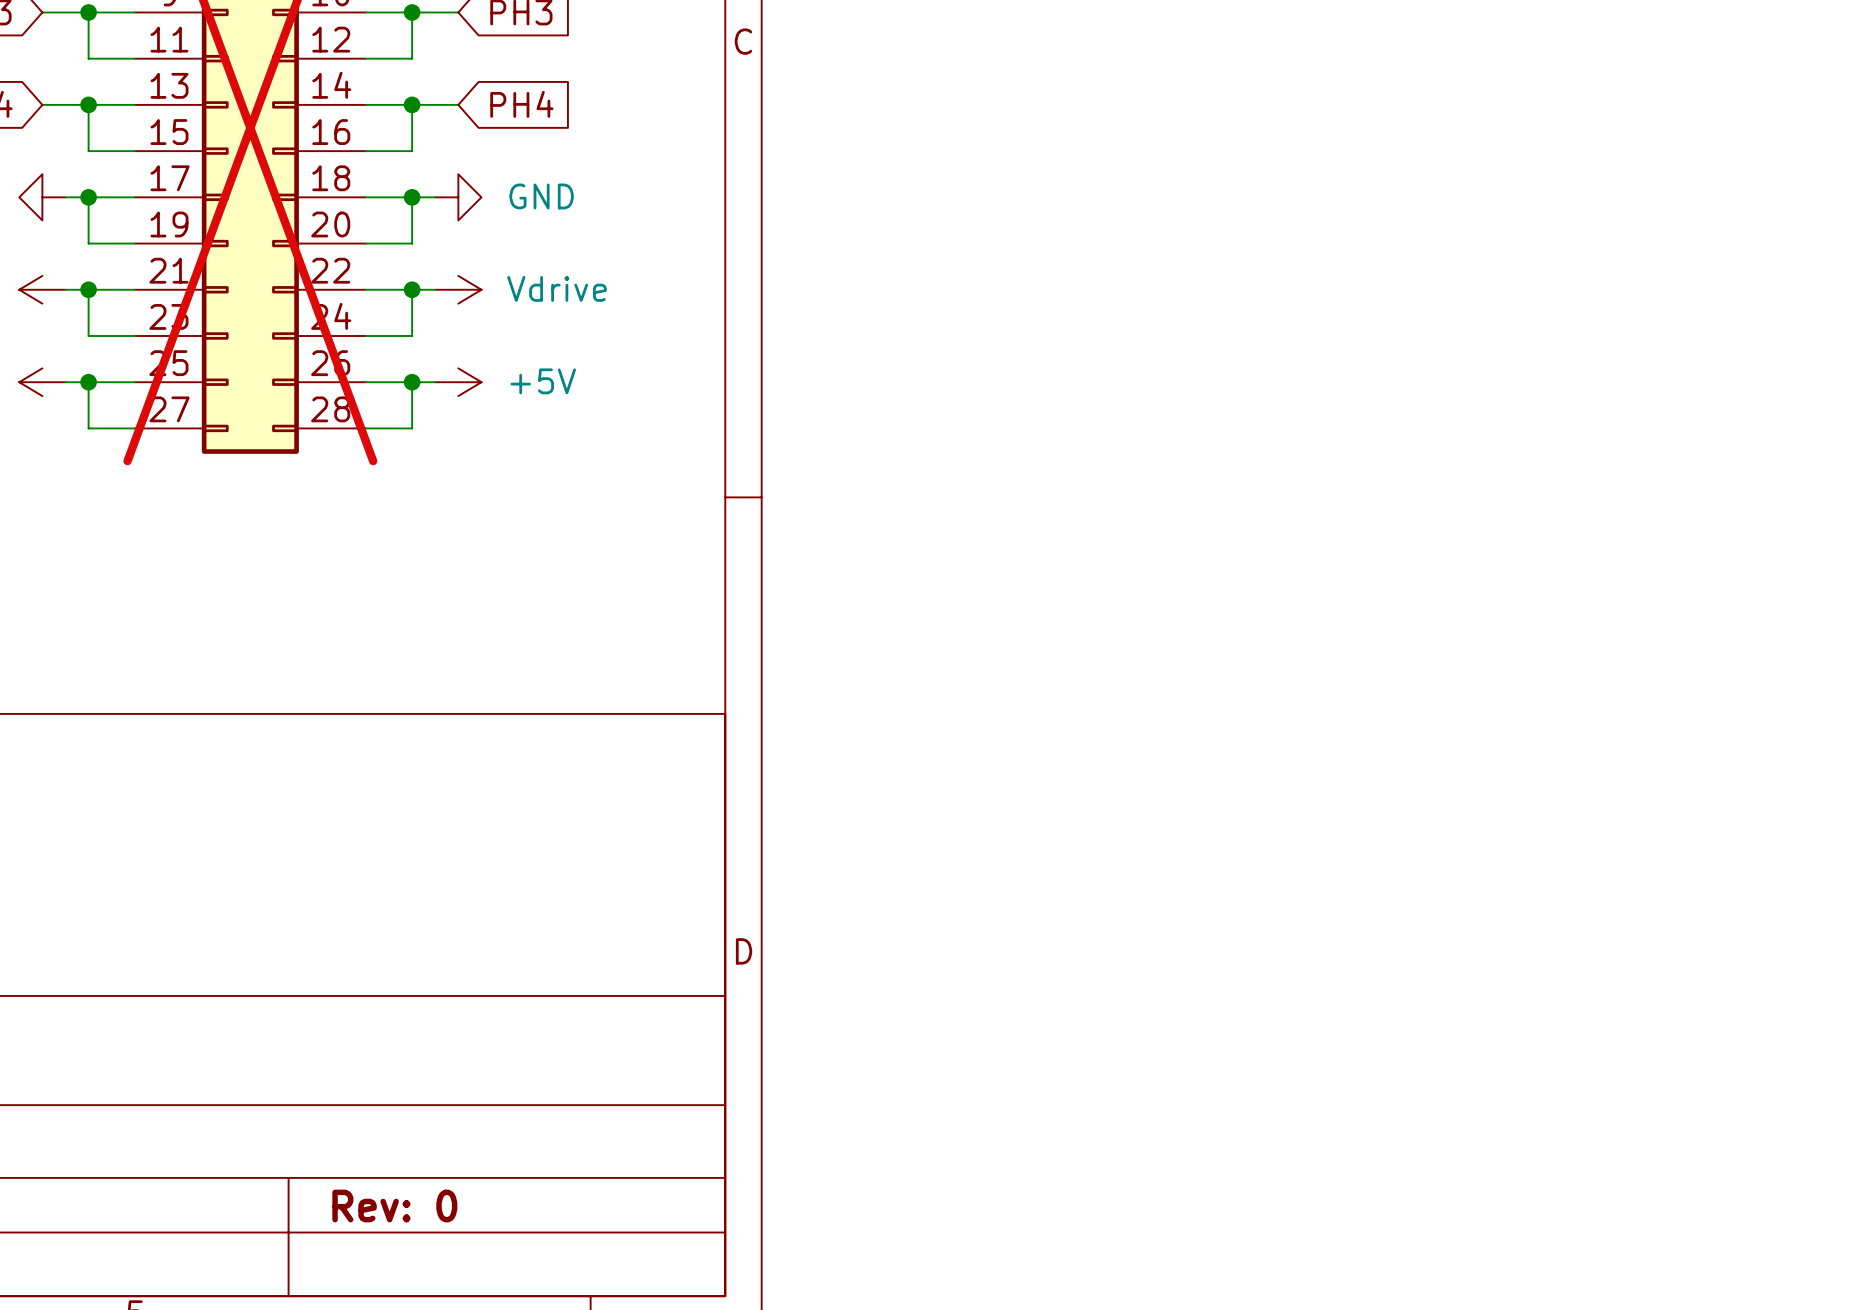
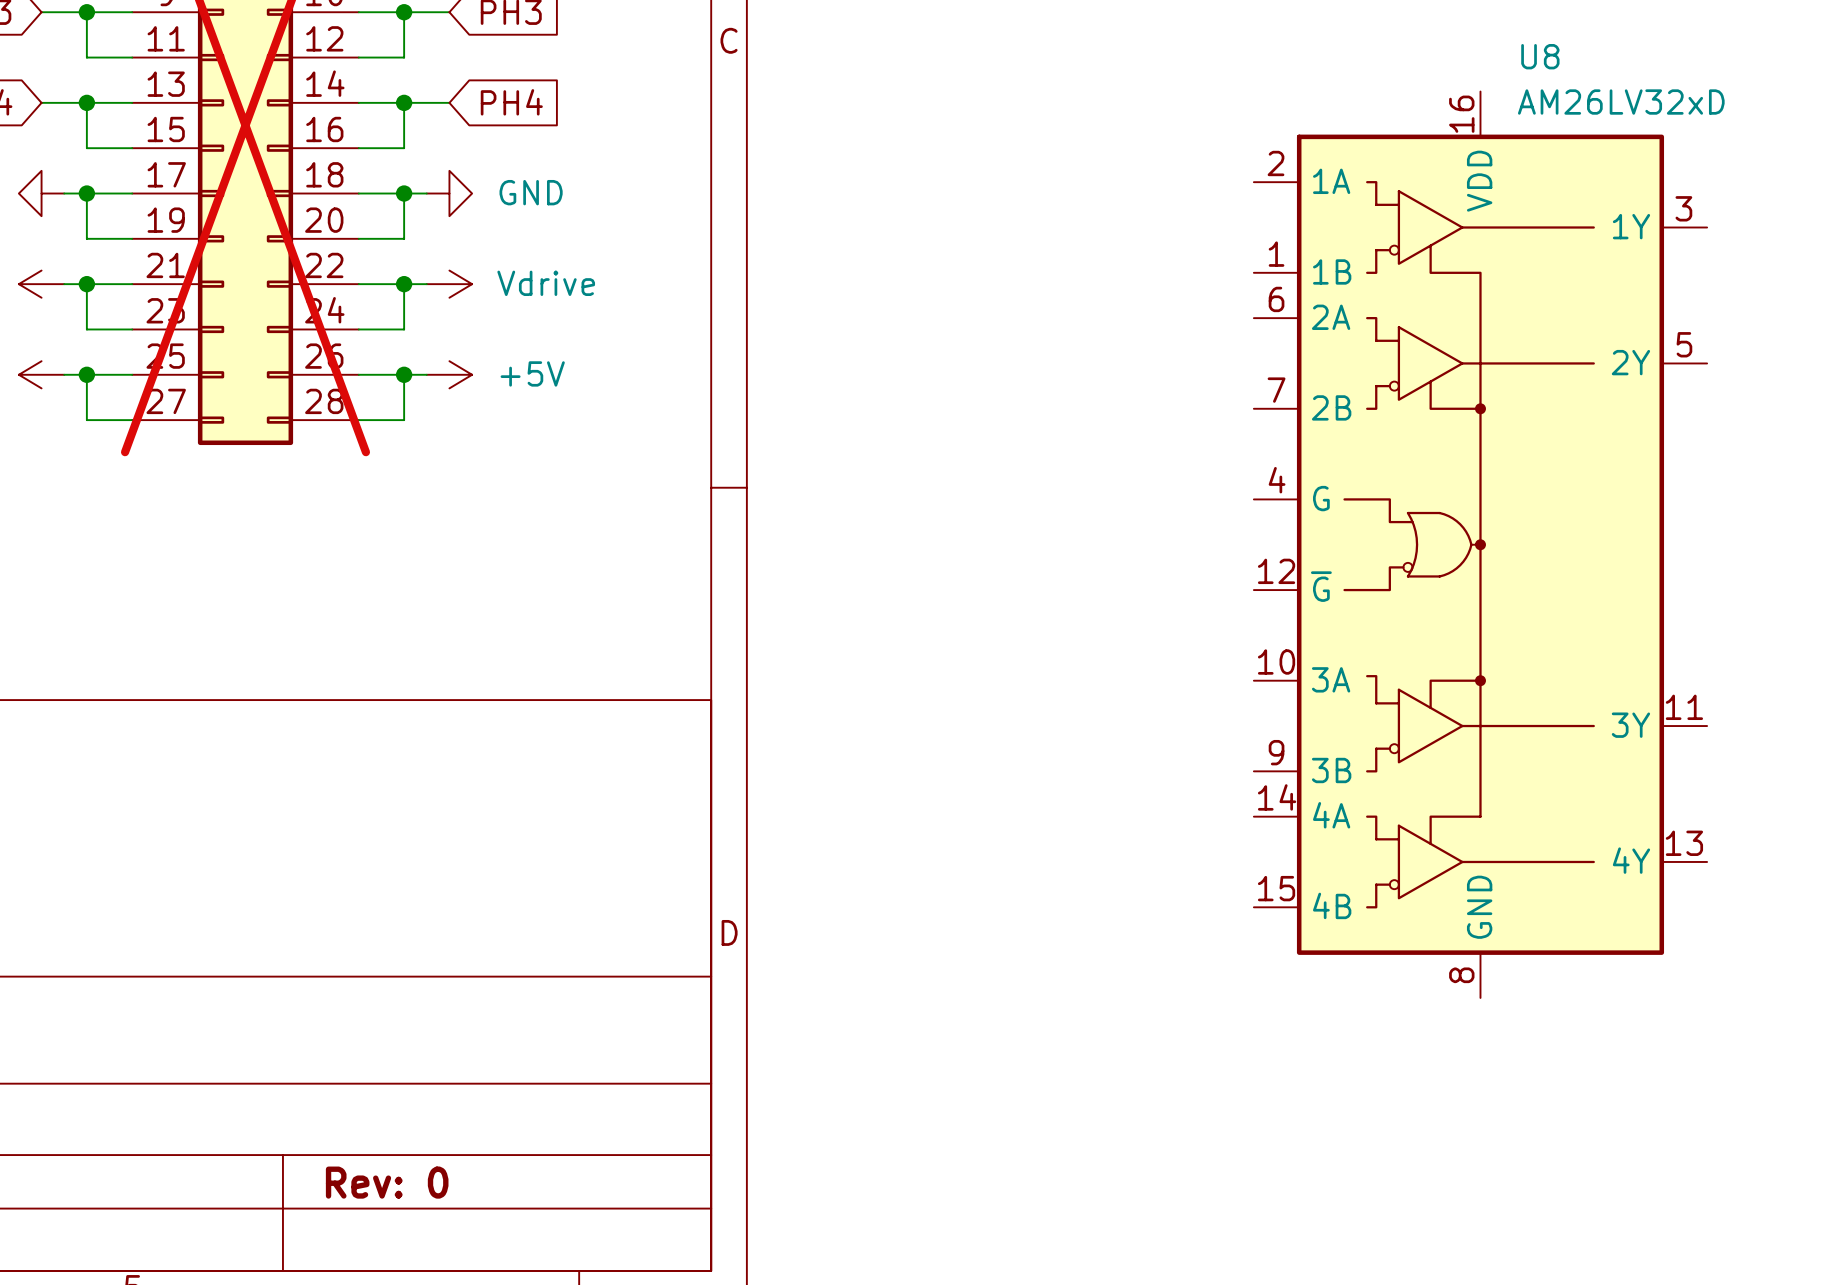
U8: none -> AM26LV32xD (1480, 544)

